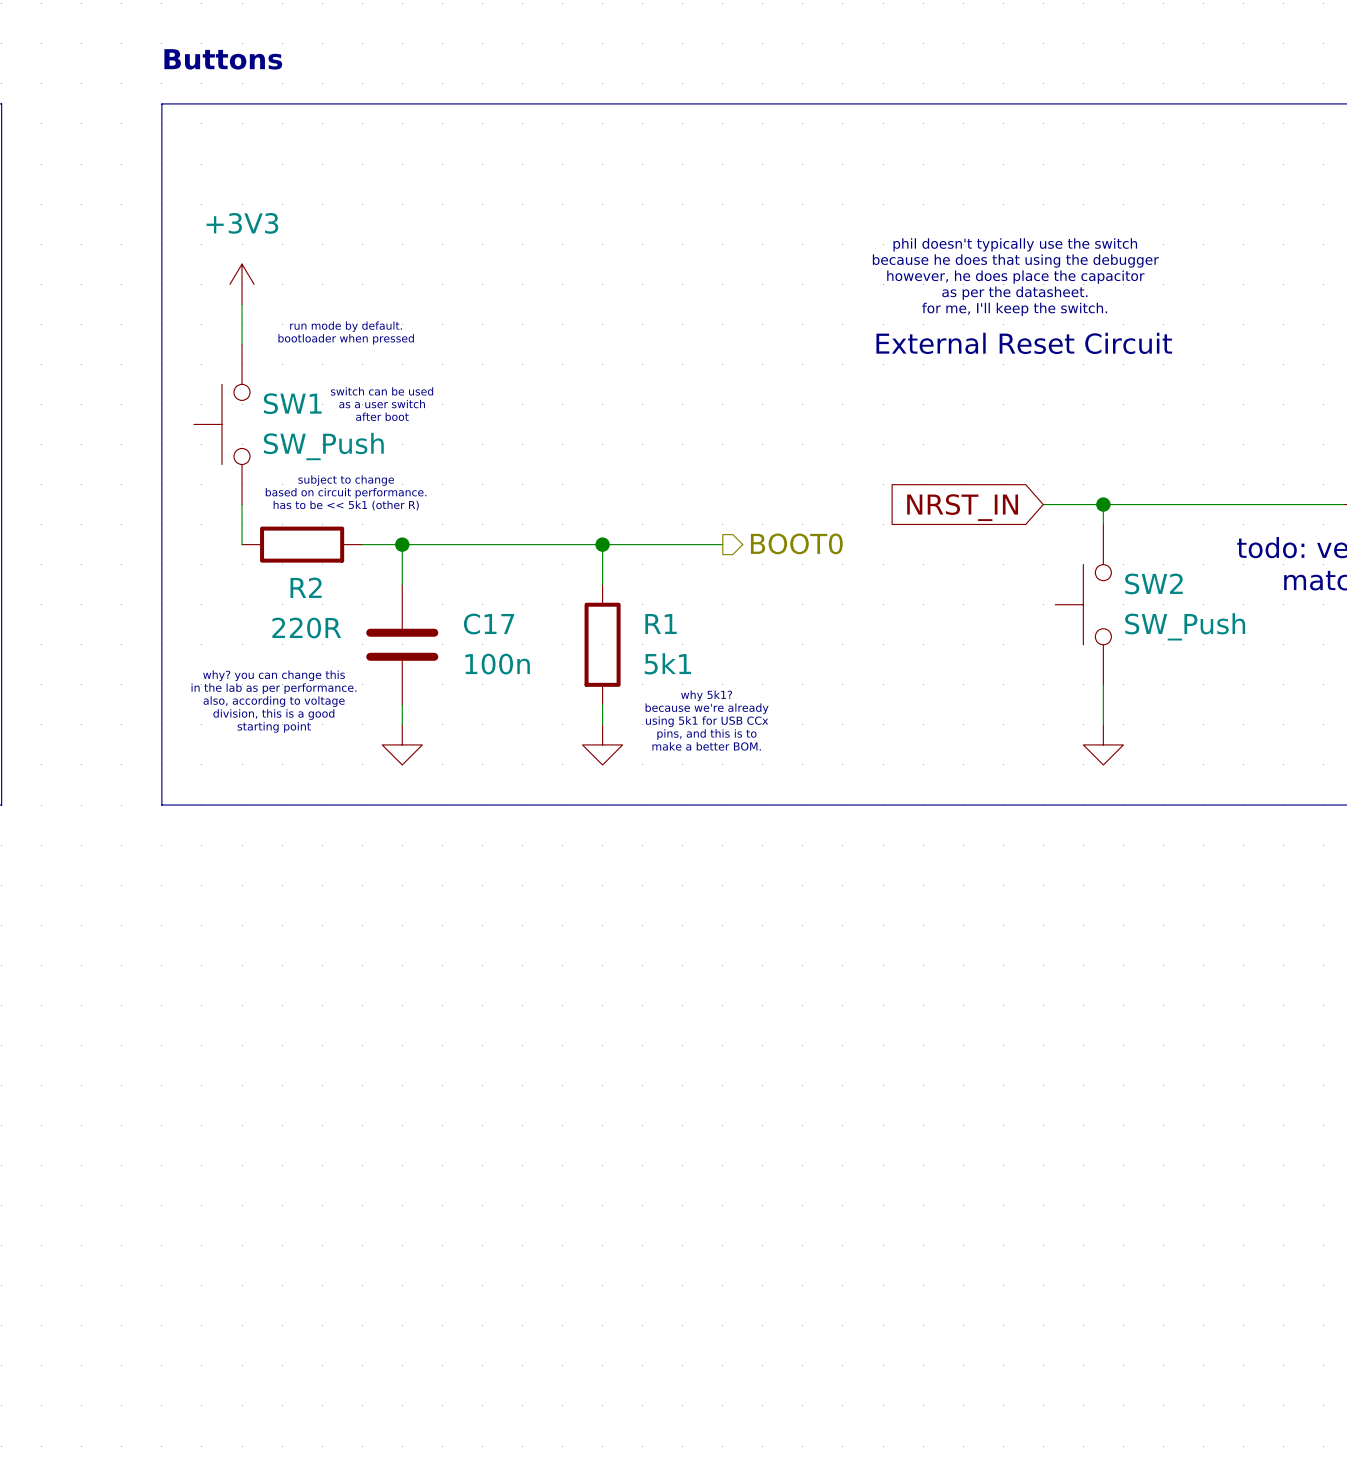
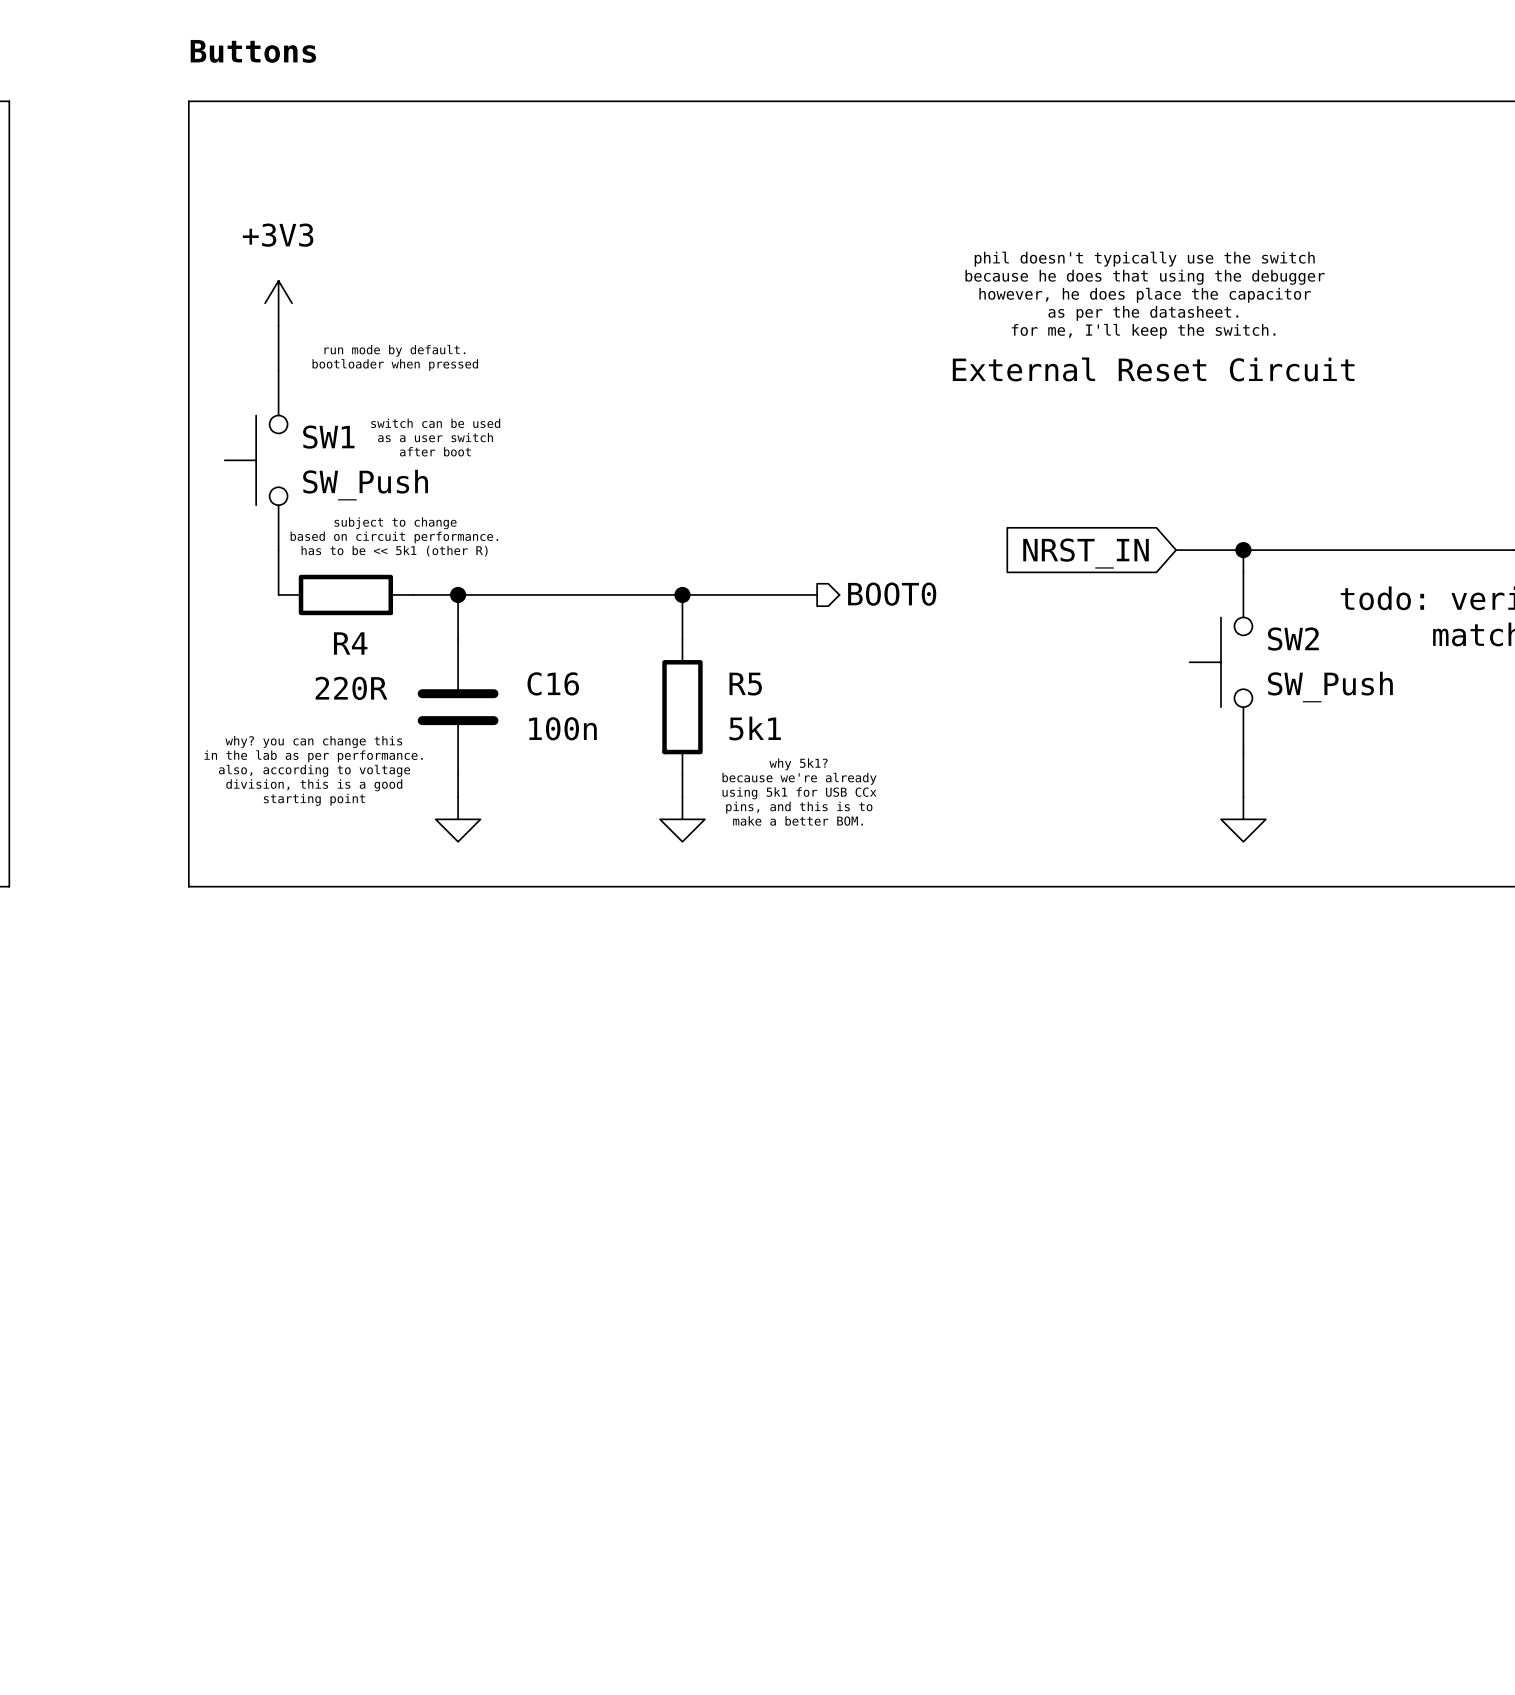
R2 name: R2 (306, 587) -> R4 (350, 643)
C17 name: C17 (489, 624) -> C16 (553, 683)
R1 name: R1 (661, 624) -> R5 (745, 684)

